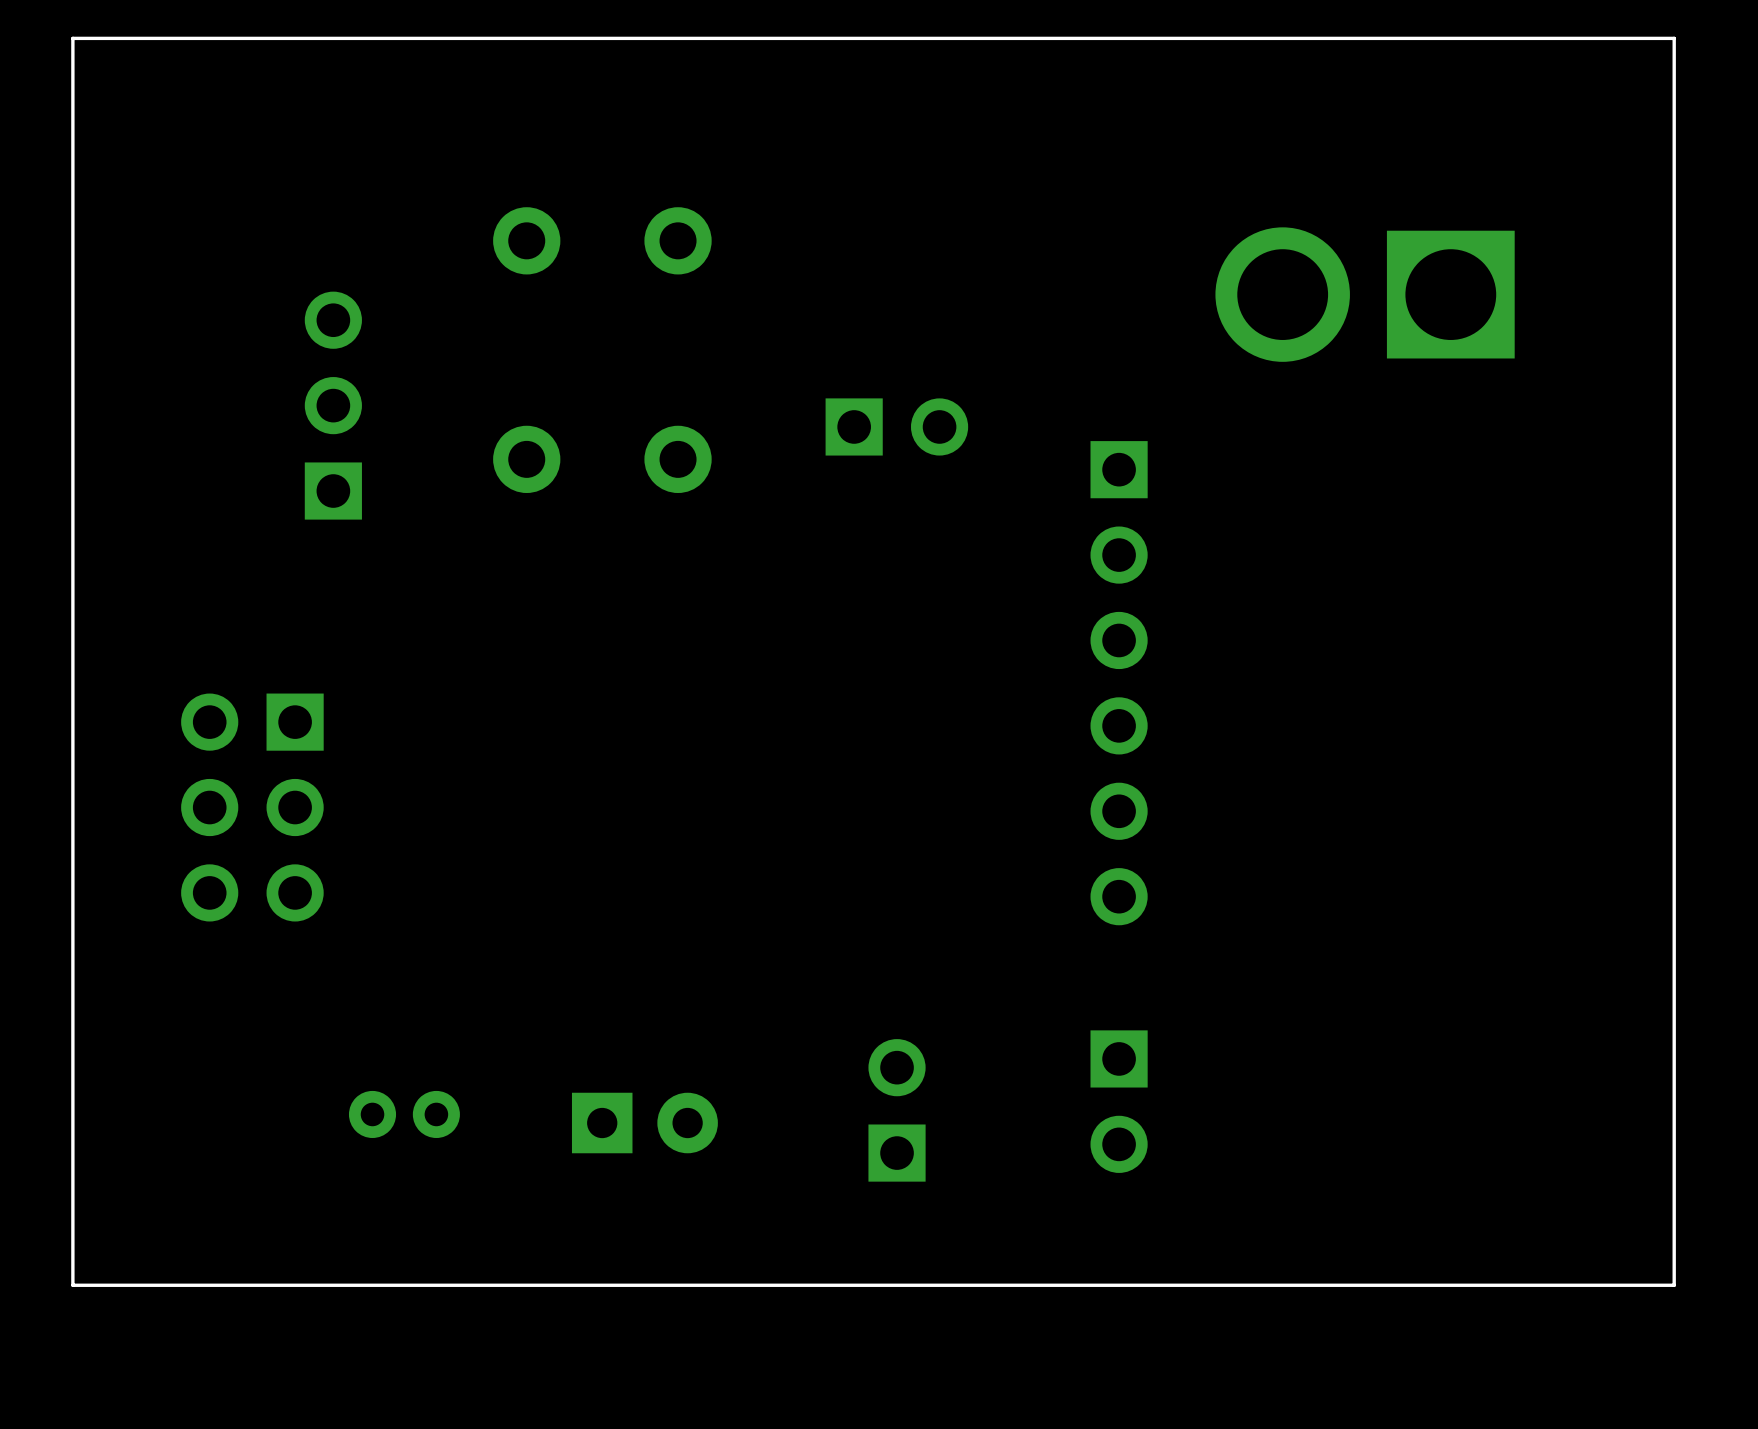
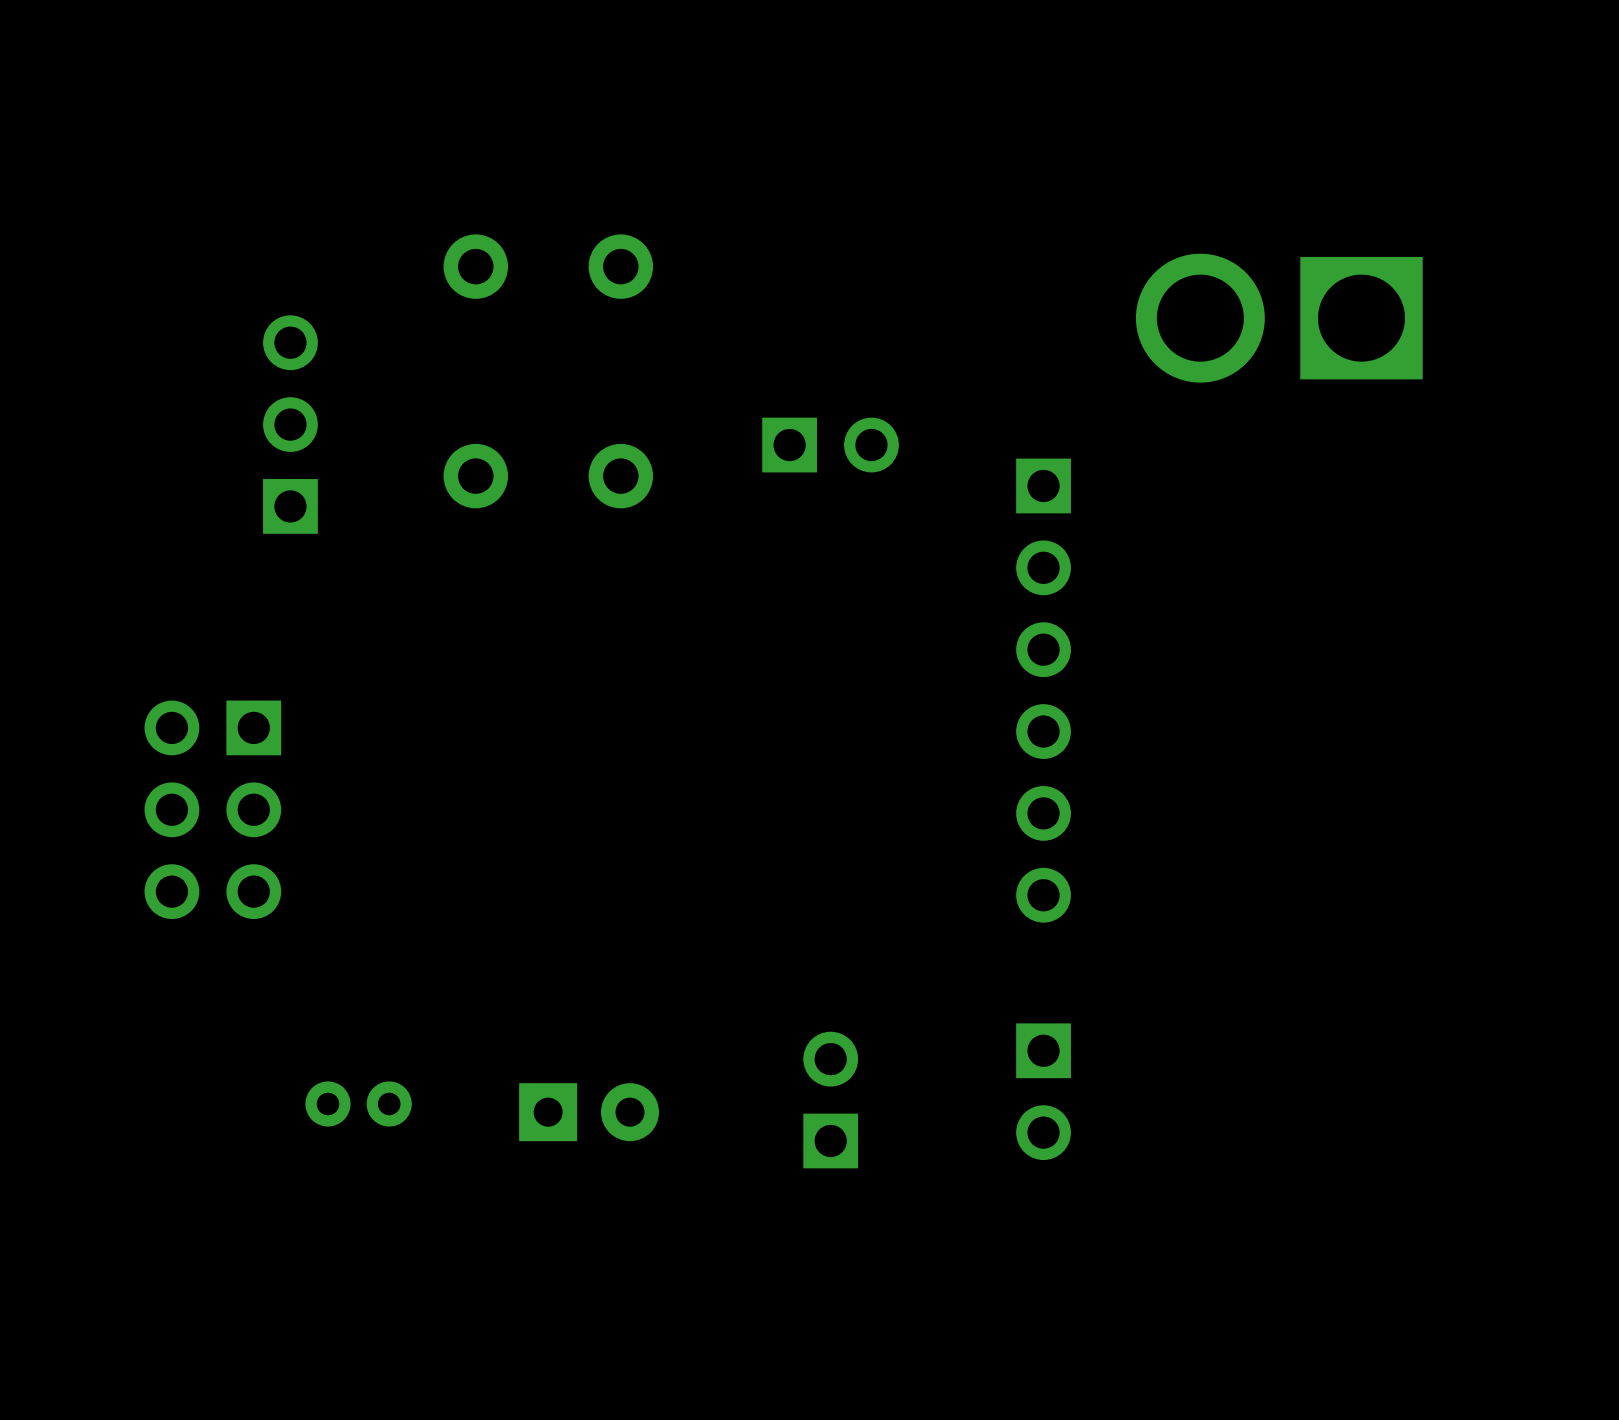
board edge: (1674, 38) (72, 38) (72, 1285) (1674, 1285) (1674, 38) -> none

